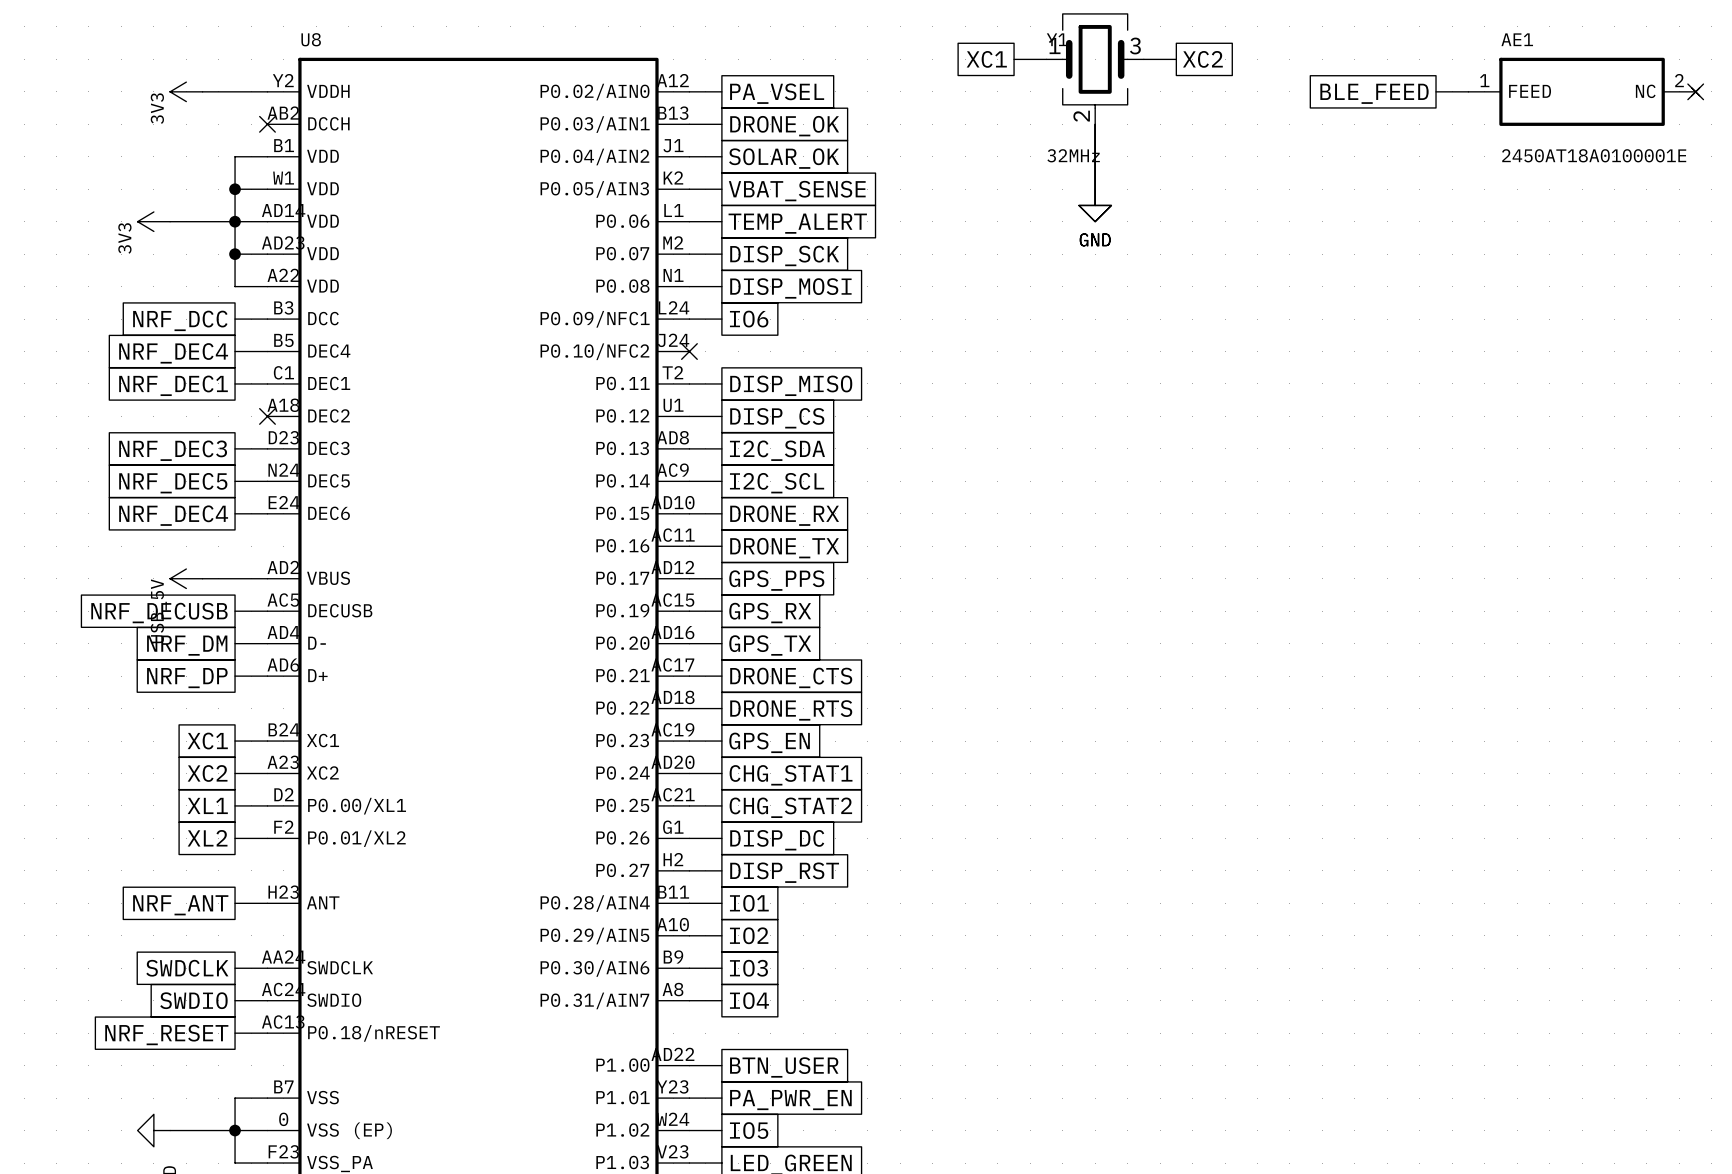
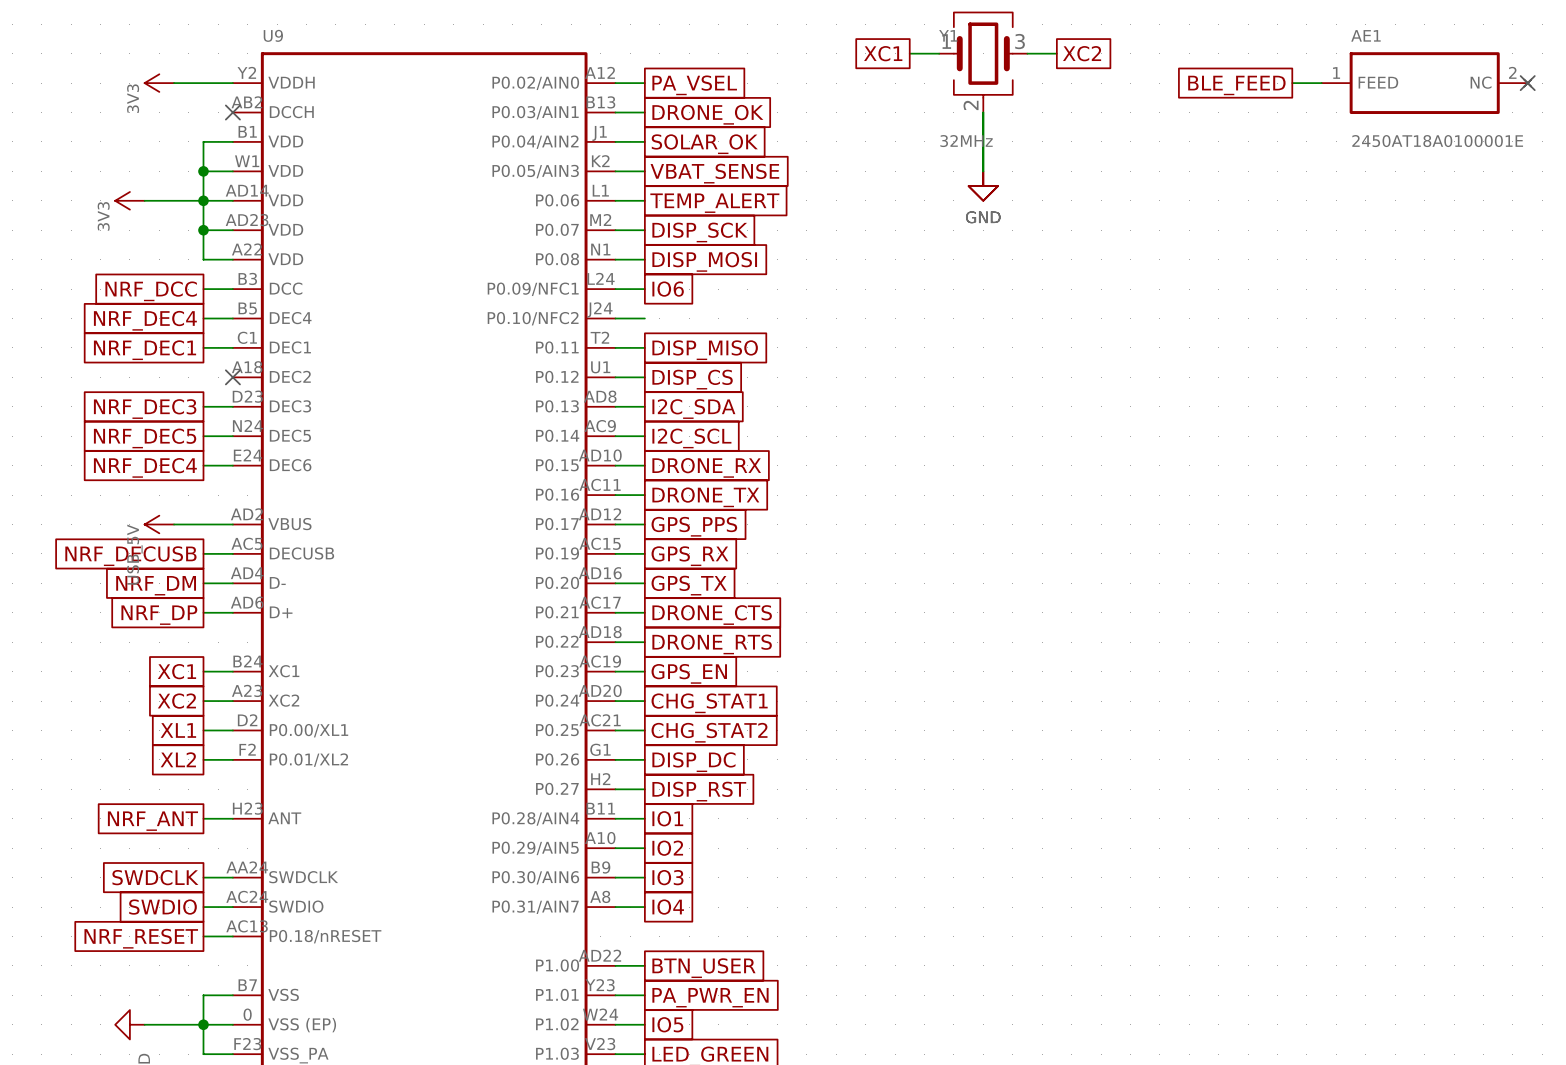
U8 name: U8 (311, 39) -> U9 (273, 35)
wire: none -> (615, 318) (644, 318)
no-connect mark: (689, 351) -> none

